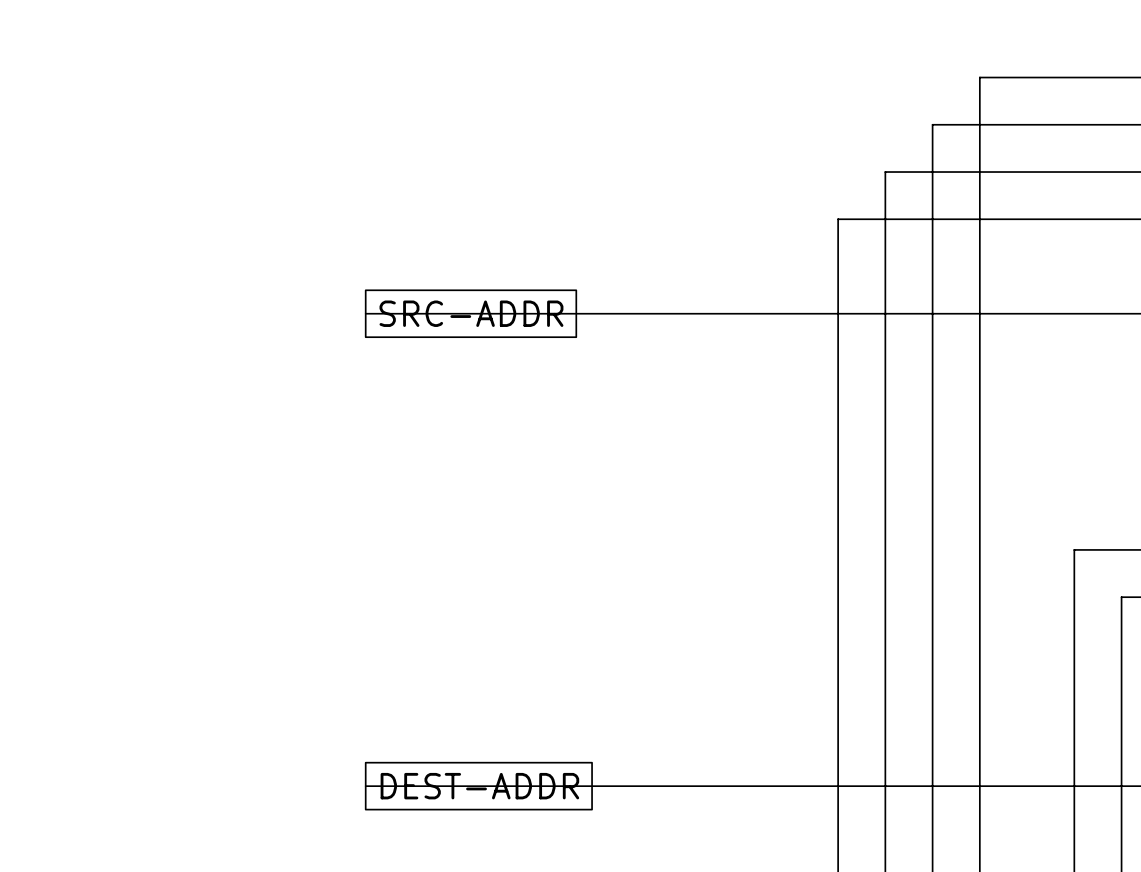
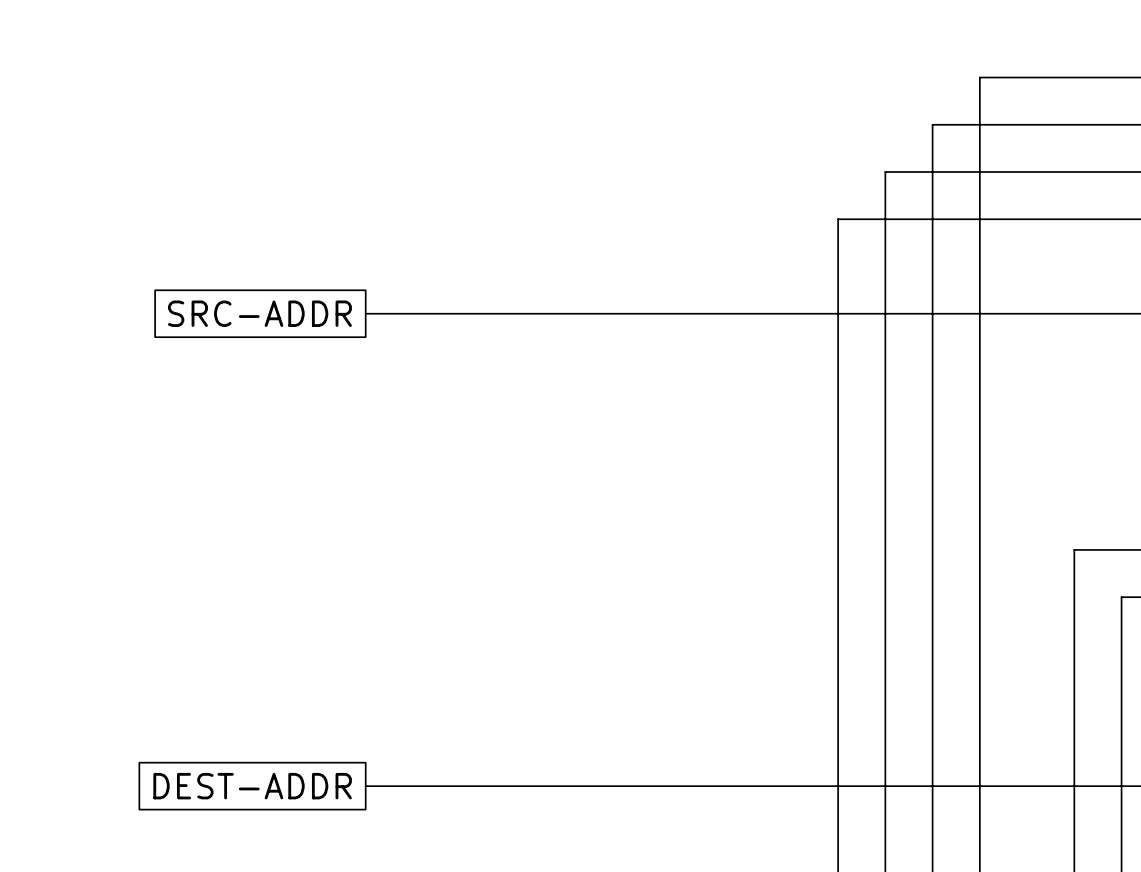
global label rotation: 0° (471, 313) -> 180° (259, 313)
global label rotation: 0° (479, 786) -> 180° (252, 786)

